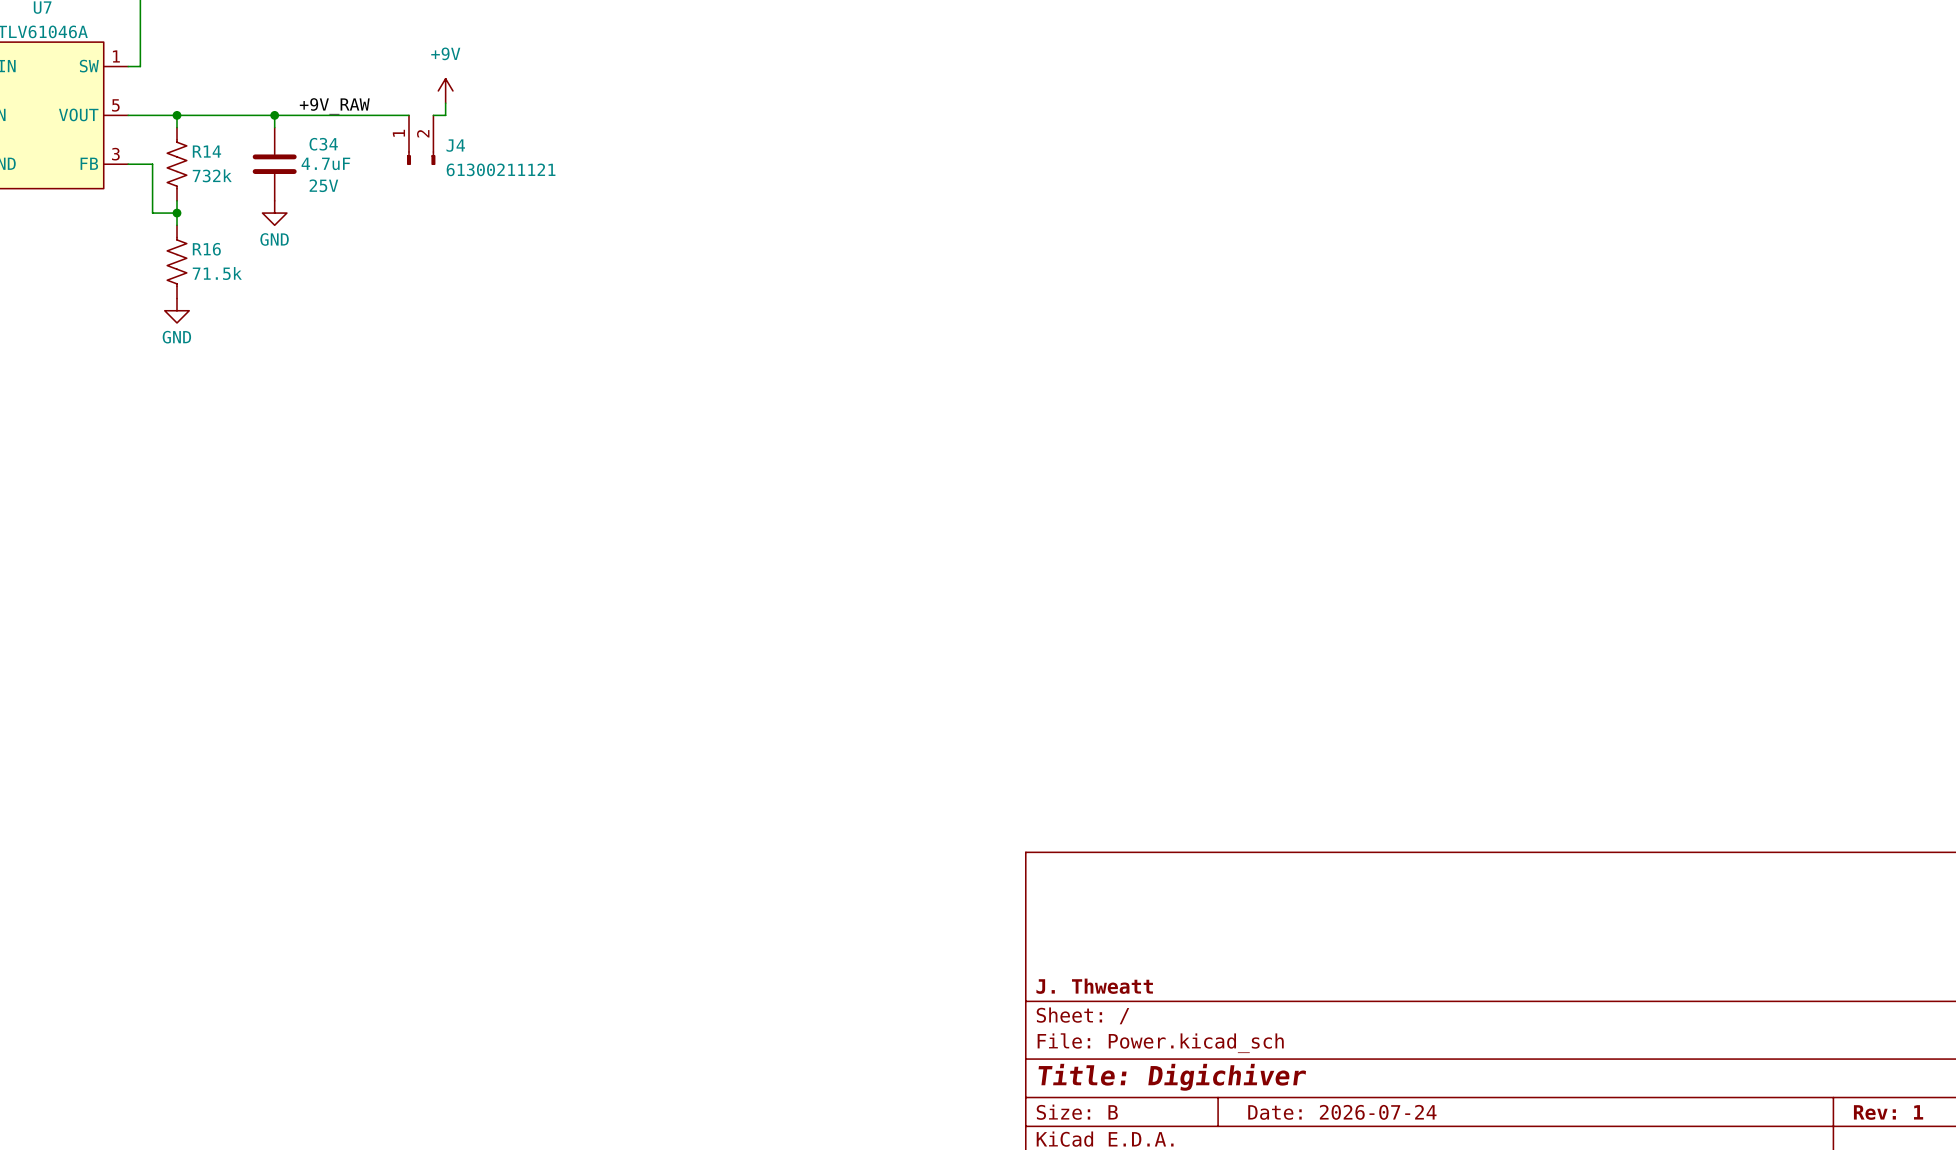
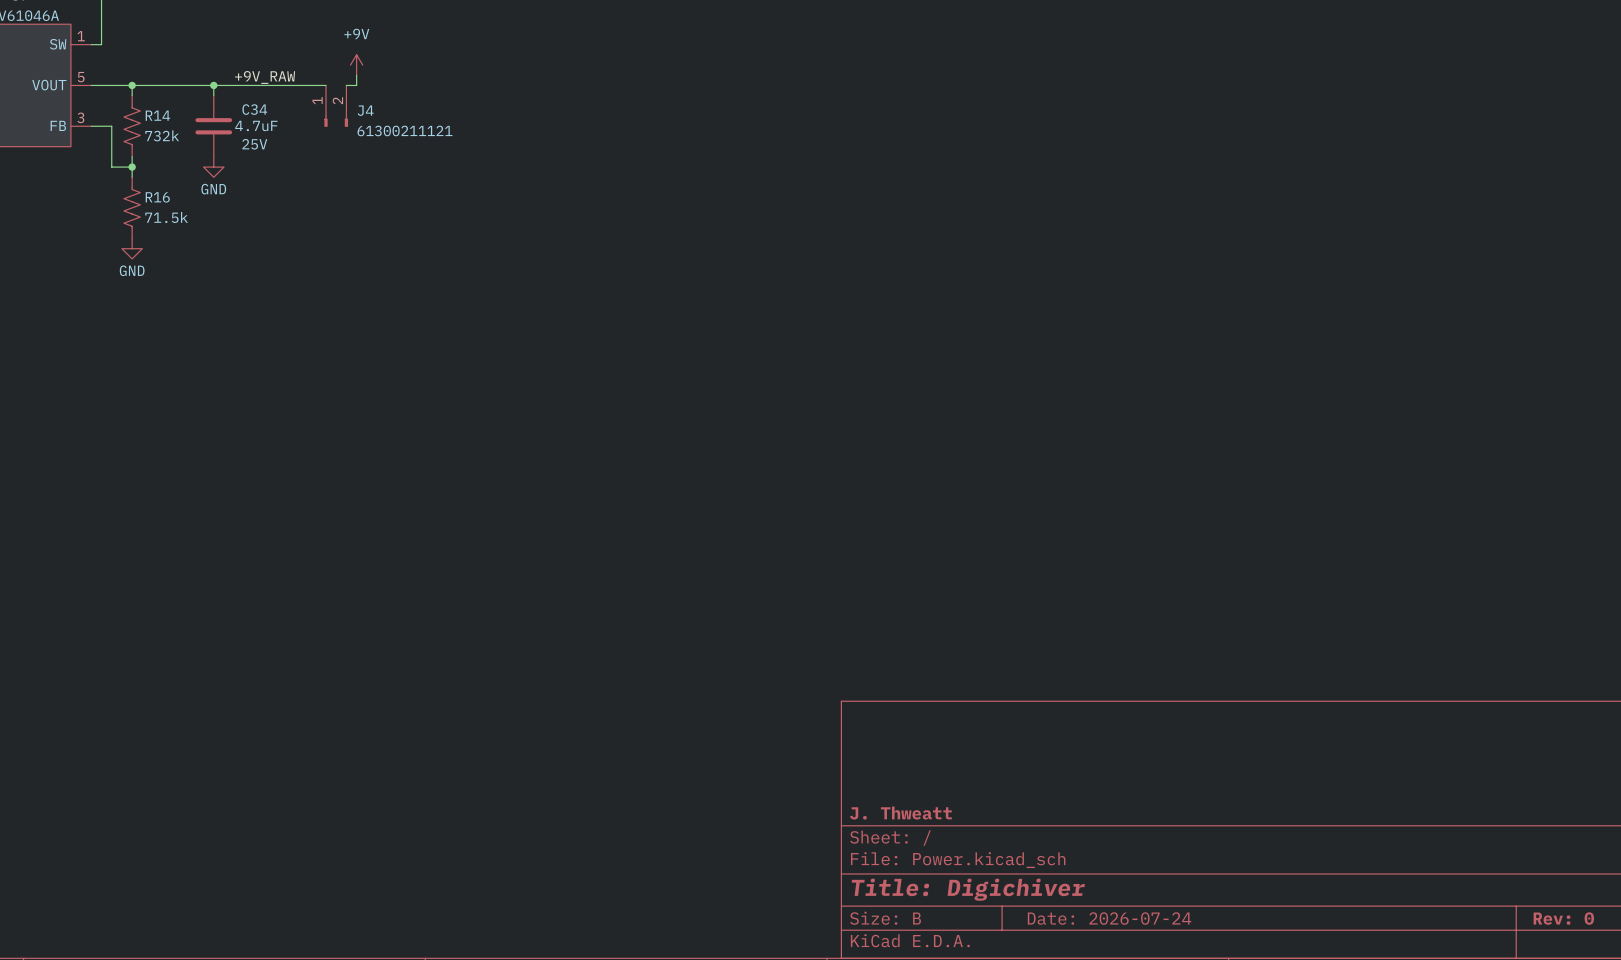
title block: Rev: 1 (1888, 1112) -> Rev: 0 (1563, 918)

